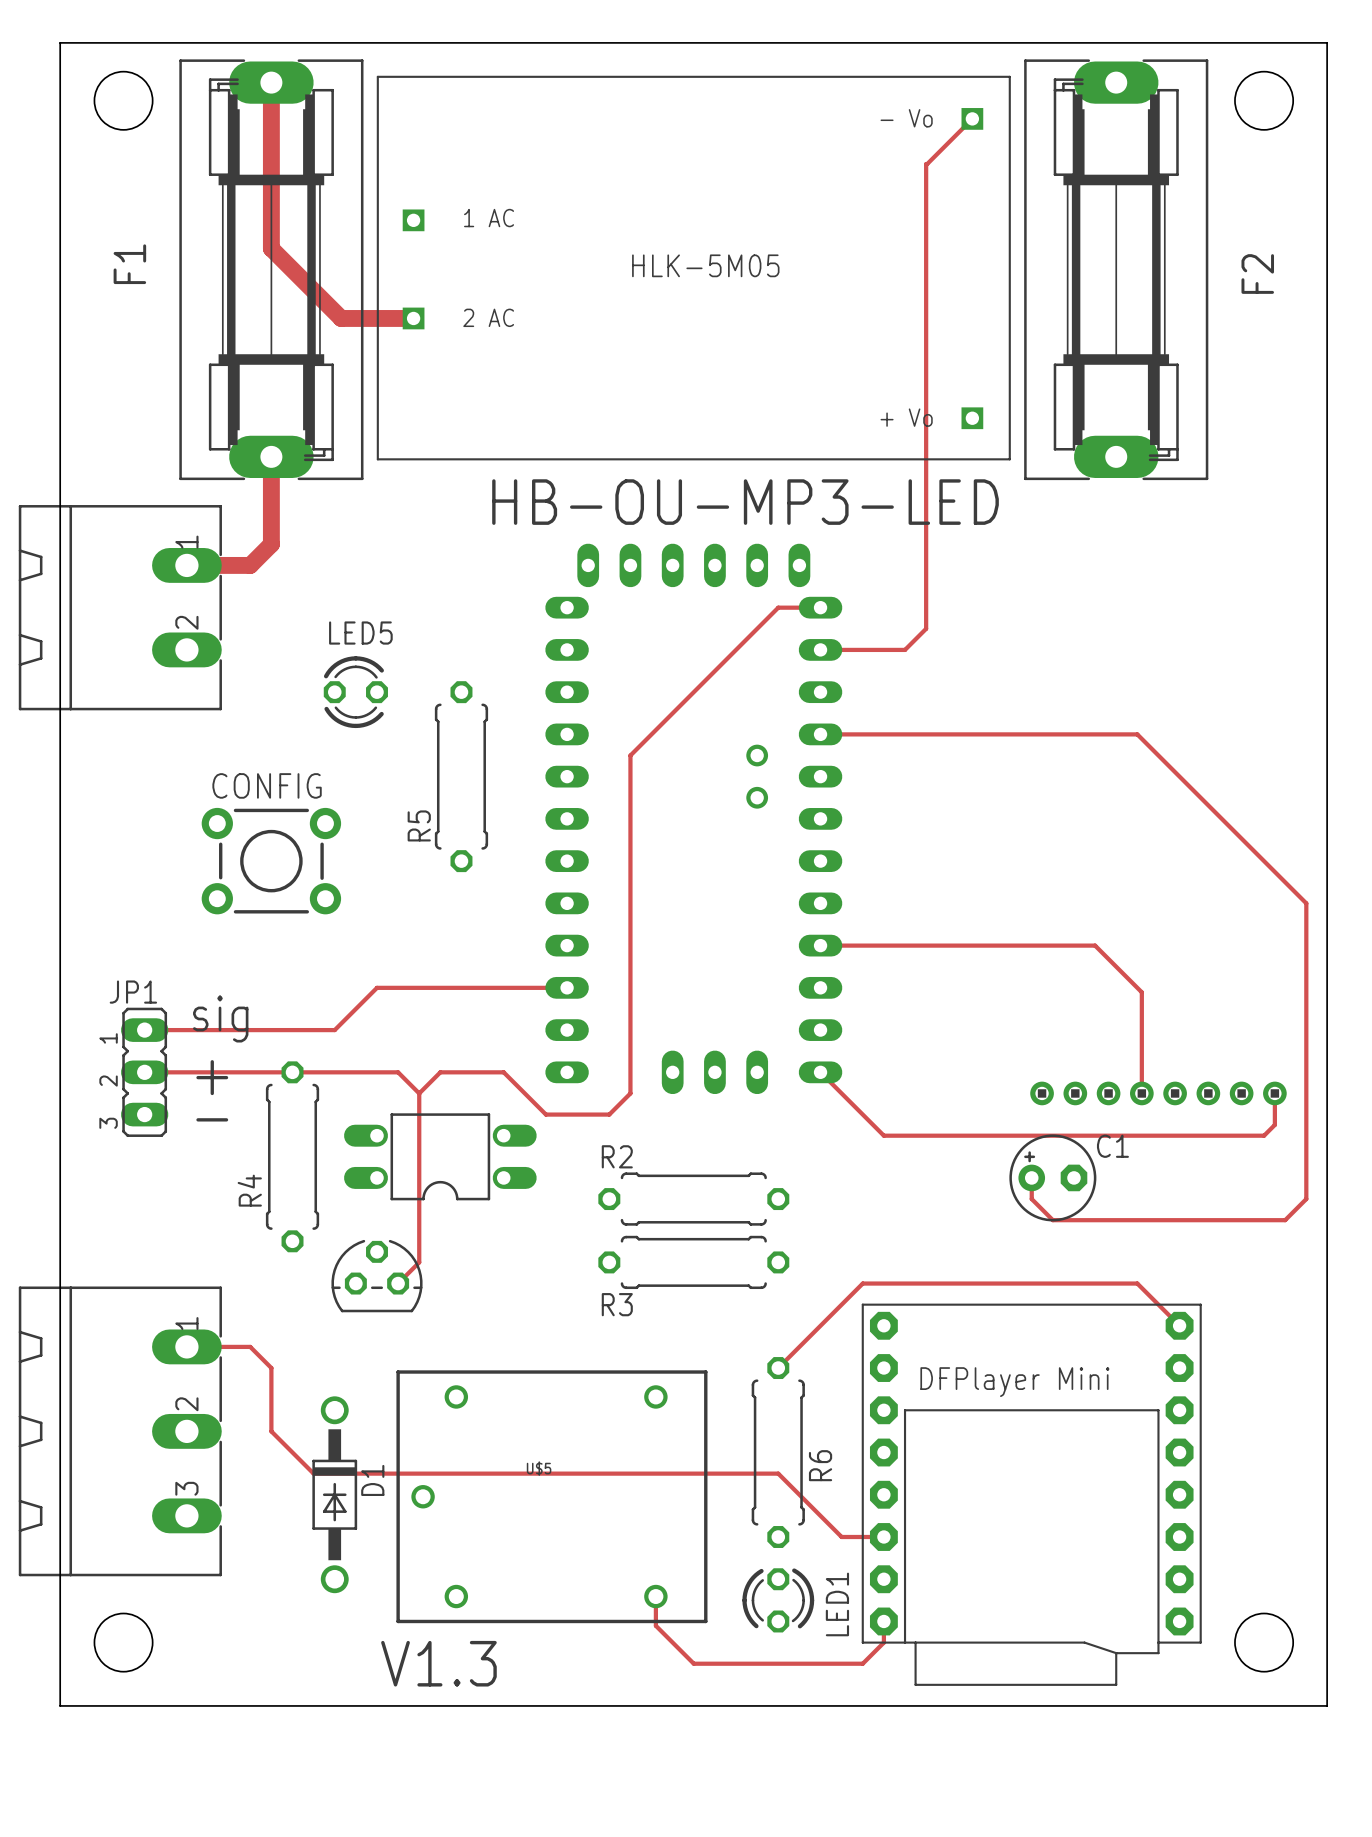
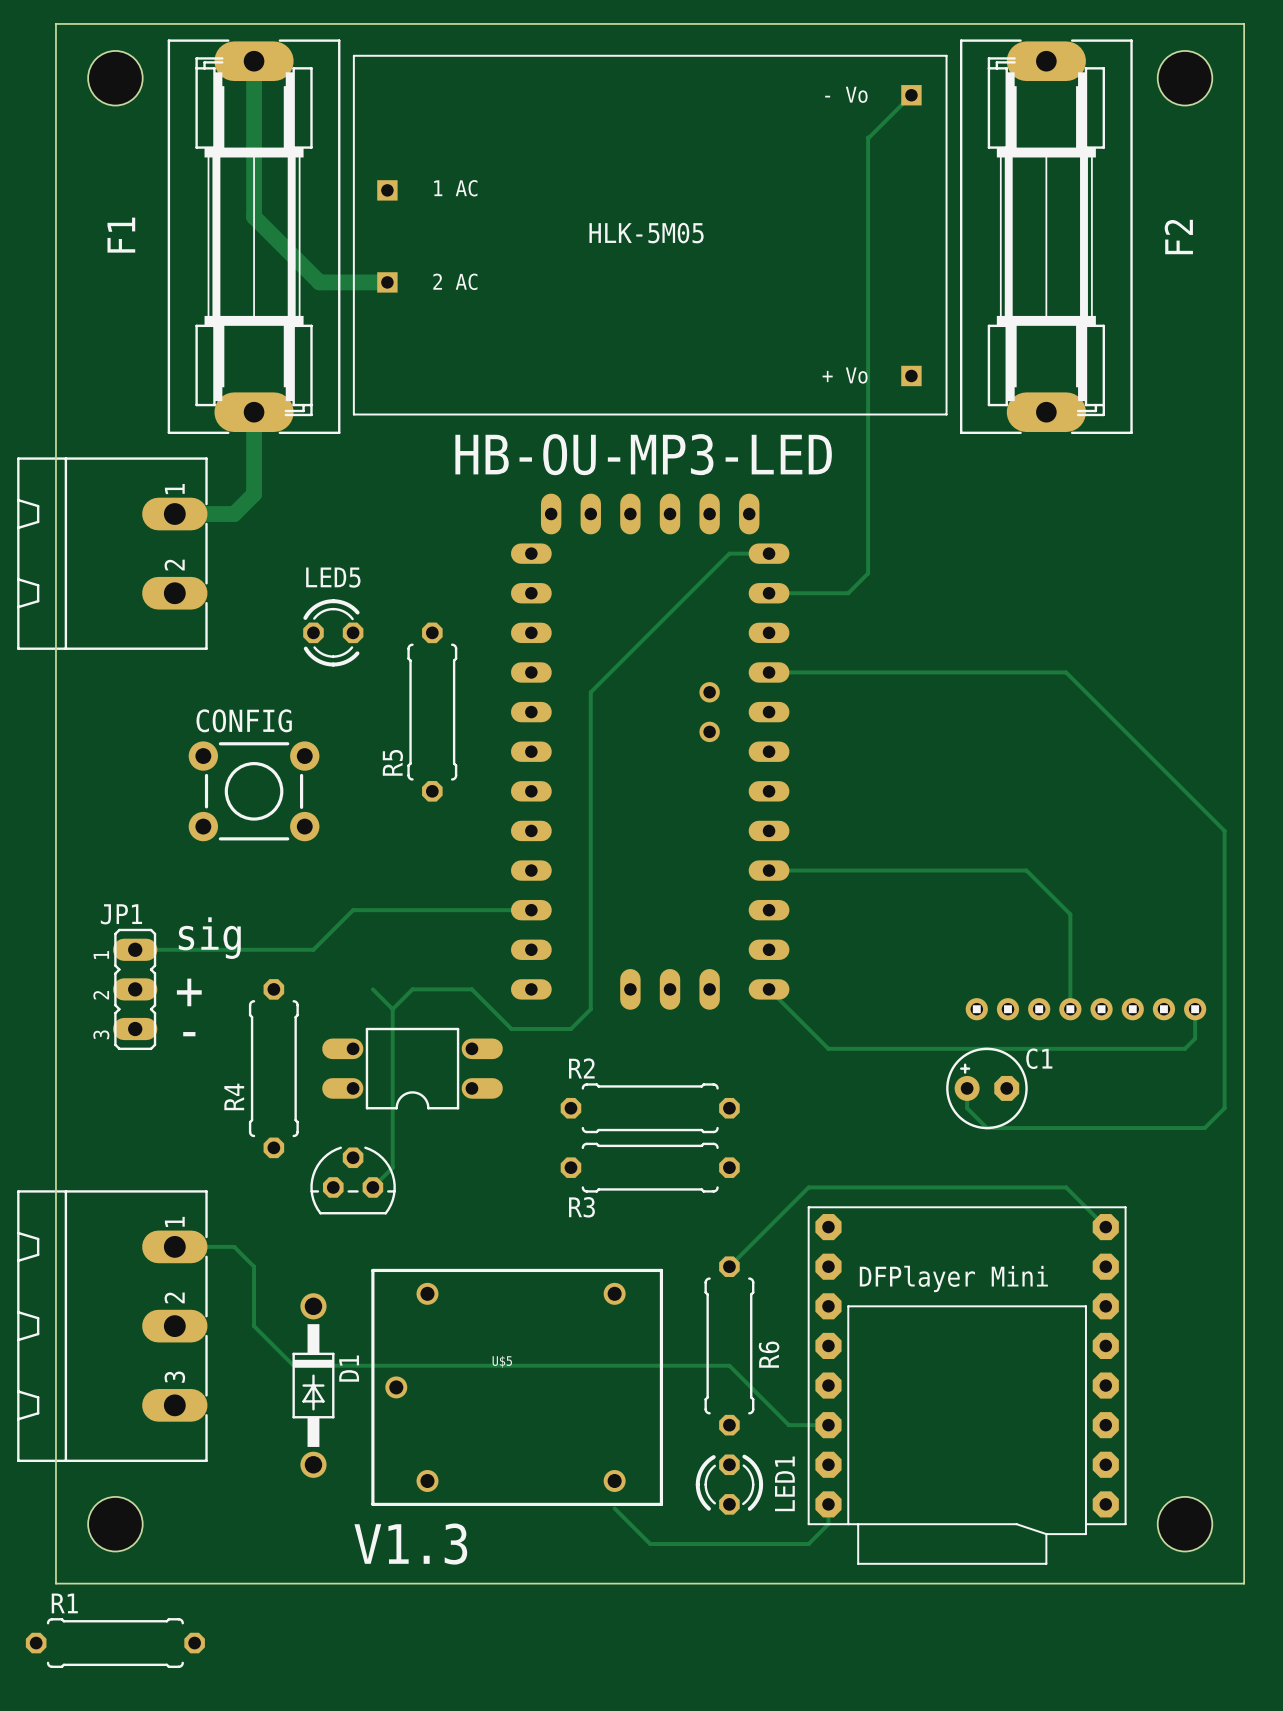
track: (144, 1072) (398, 1072) -> none
track: (655, 1596) (655, 1625) -> none
R1: none -> (115, 1643)

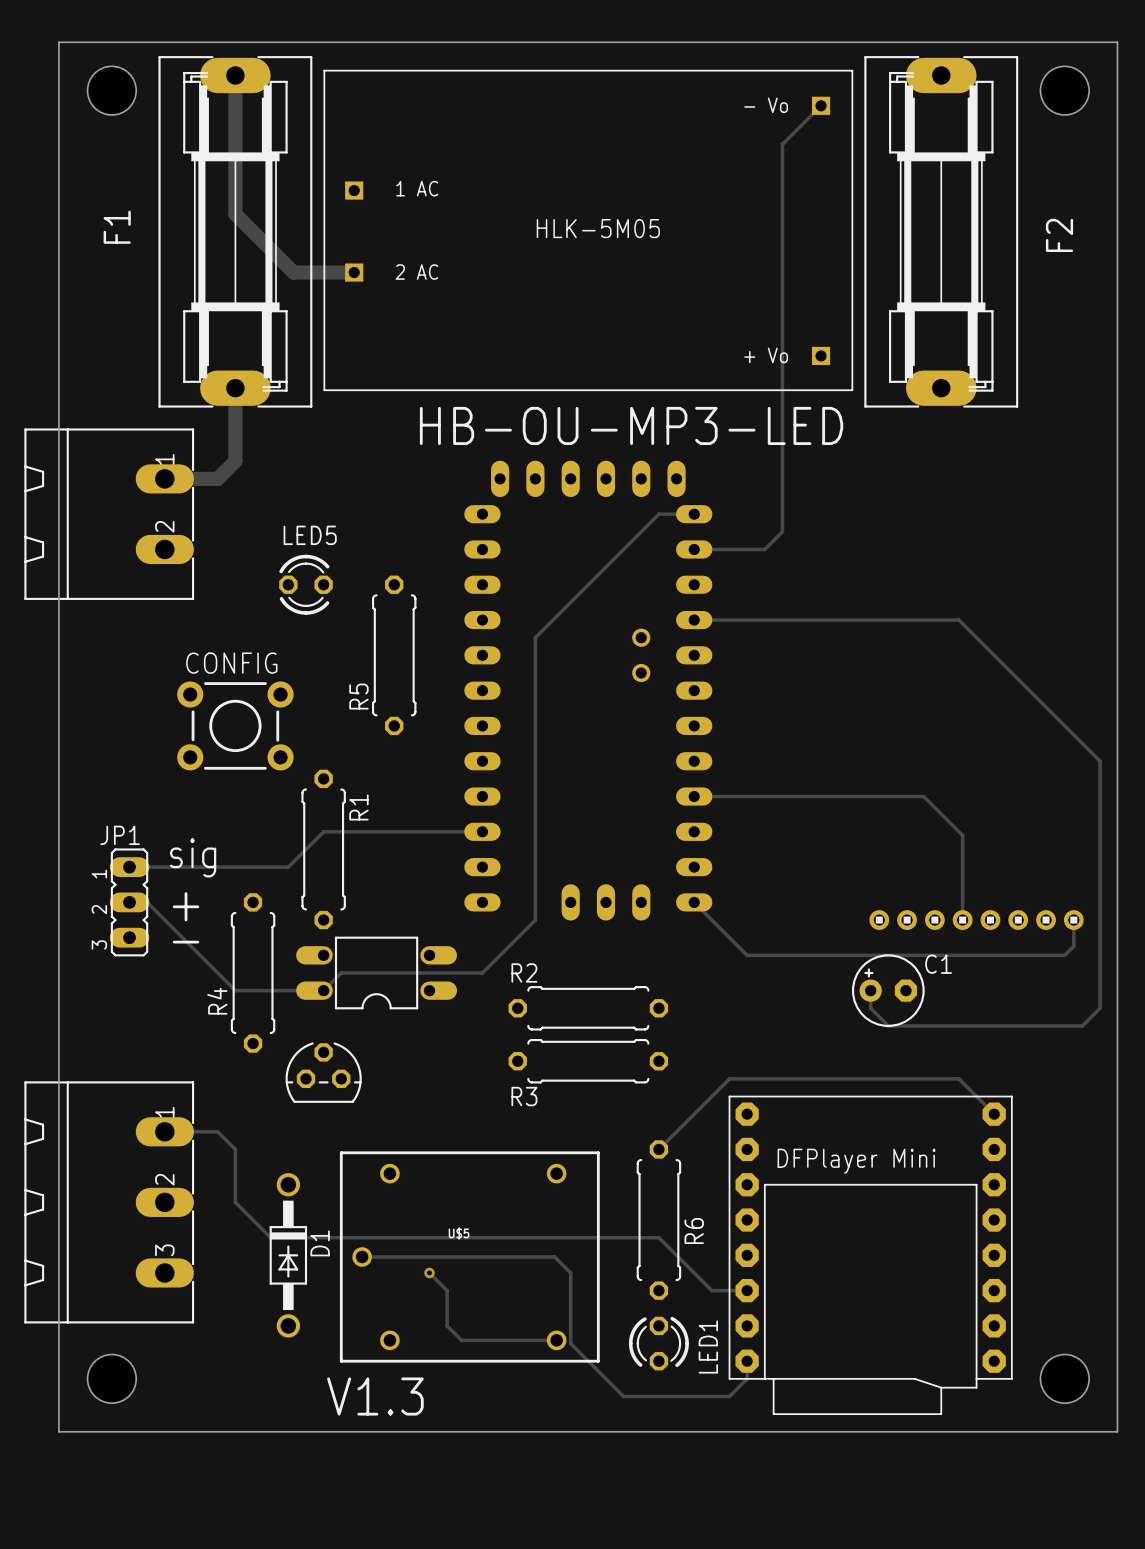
track: (372, 989) (392, 1009) -> none
track: (392, 1009) (412, 989) (471, 989) (511, 1029) (570, 1029) -> (129, 902) (147, 902) (235, 990) (323, 990) (341, 972) (482, 972) (517, 937)
track: (392, 1009) (392, 1167) (372, 1187) -> none
track: none -> (429, 1272) (447, 1290) (447, 1325) (461, 1340) (556, 1340)
via: none -> (429, 1272)
track: (614, 1508) (650, 1544) (689, 1544) -> (362, 1257) (554, 1257) (570, 1272) (570, 1343) (623, 1396)
R1 rotation: 0° (115, 1643) -> 90° clockwise (323, 849)
R1 position: (115, 1643) -> (323, 849)

